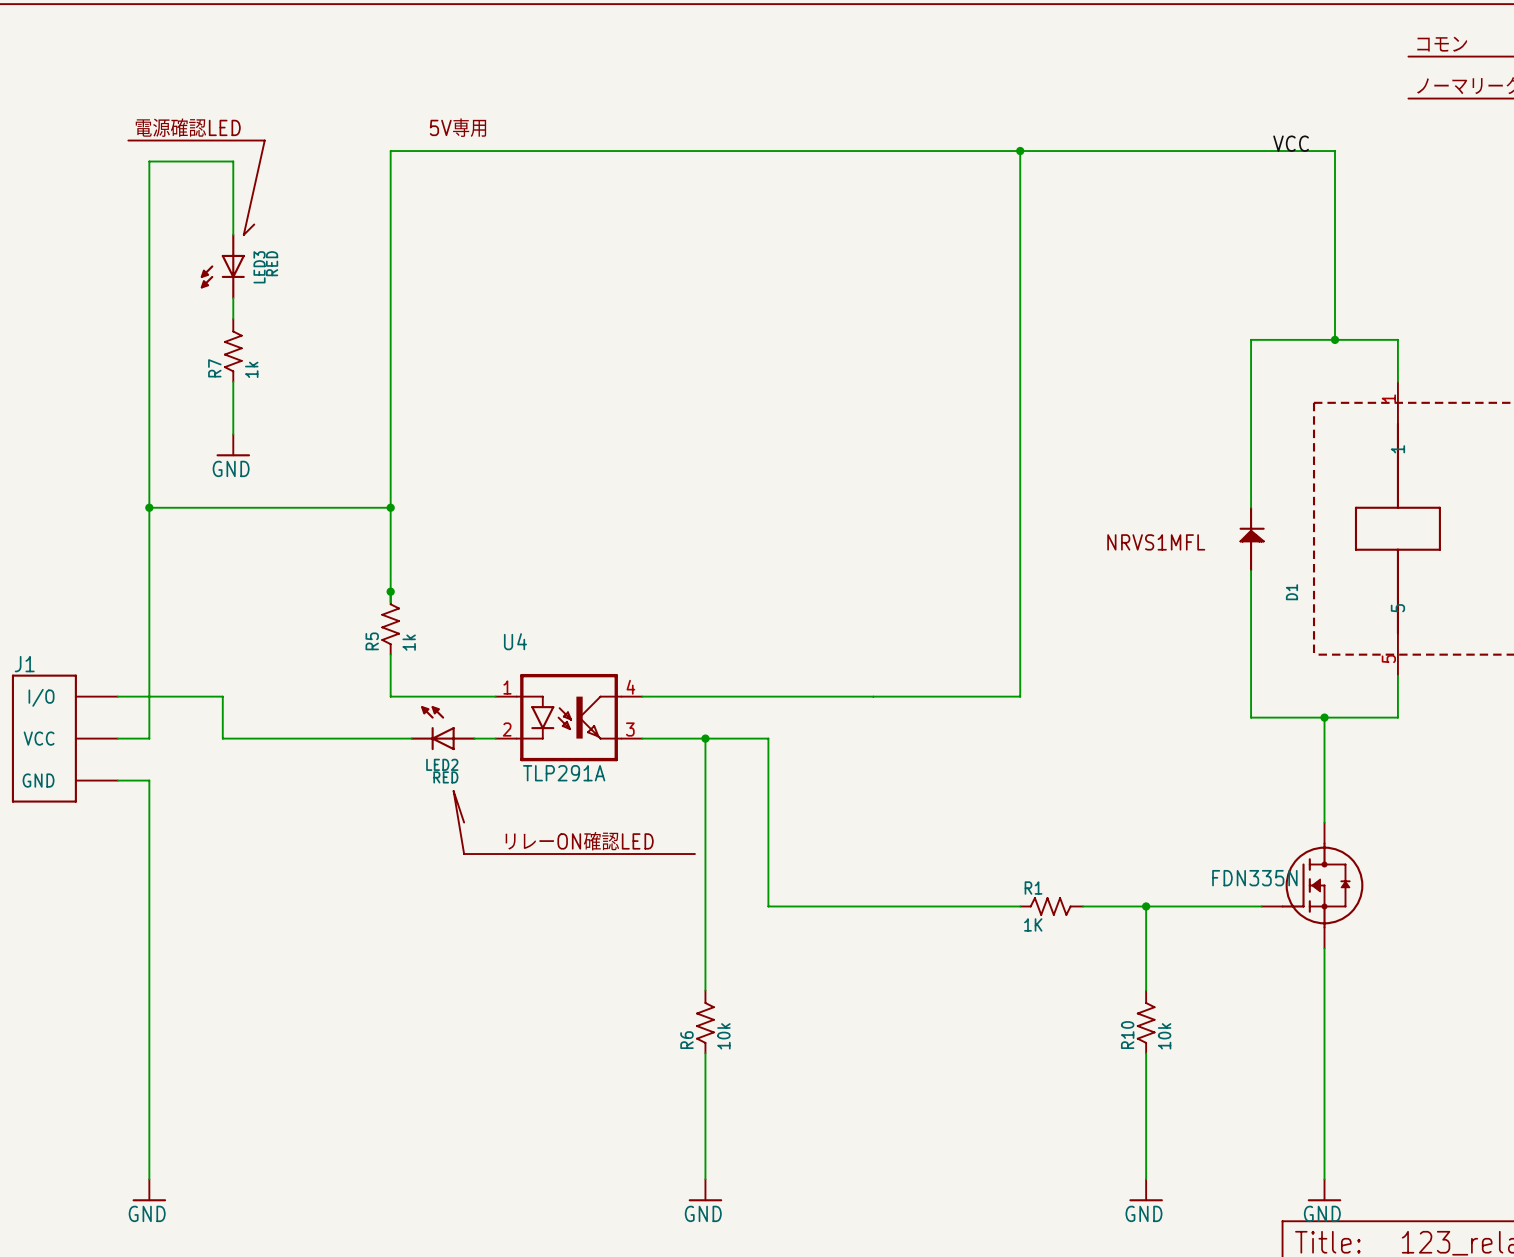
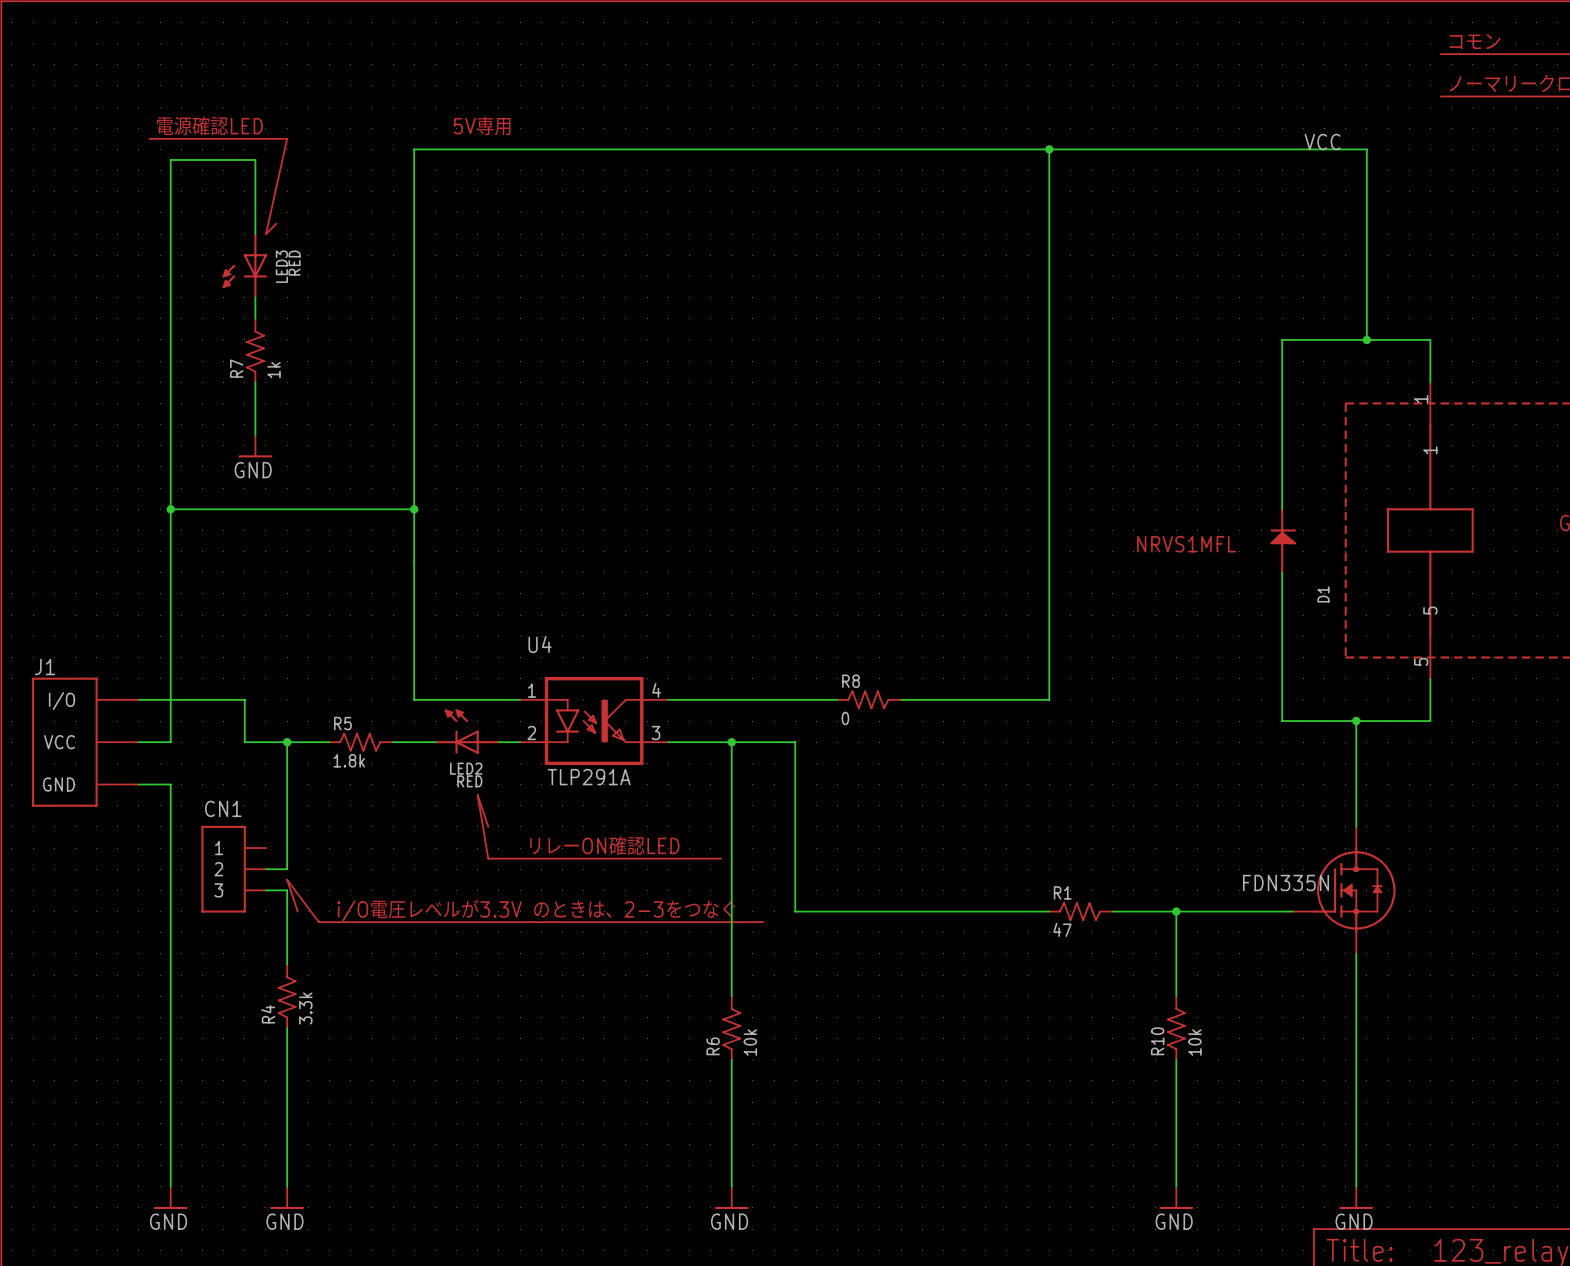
junction: (390, 591) -> none
wire: none -> (414, 604) (414, 657)
R5 rotation: 0° (390, 623) -> 90° clockwise (361, 742)
R5 position: (390, 623) -> (361, 742)
R5 value: 1k (409, 642) -> 1.8k (349, 760)
R8: none -> 0 (869, 699)
wire: none -> (287, 742) (287, 869) (265, 869)
junction: none -> (287, 742)
CN1: none -> (233, 869)
wire: none -> (265, 890) (287, 890) (287, 964)
text: none -> i/O電圧レベルが3.3V のときは、2-3をつなぐ (536, 910)
line: none -> (297, 911) (287, 879) (318, 922) (763, 922)
R1 value: 1K (1033, 924) -> 47 (1062, 929)
R4: none -> 3.3k (287, 996)
wire: none -> (287, 1027) (287, 1186)
power symbol: none -> GND (287, 1197)

